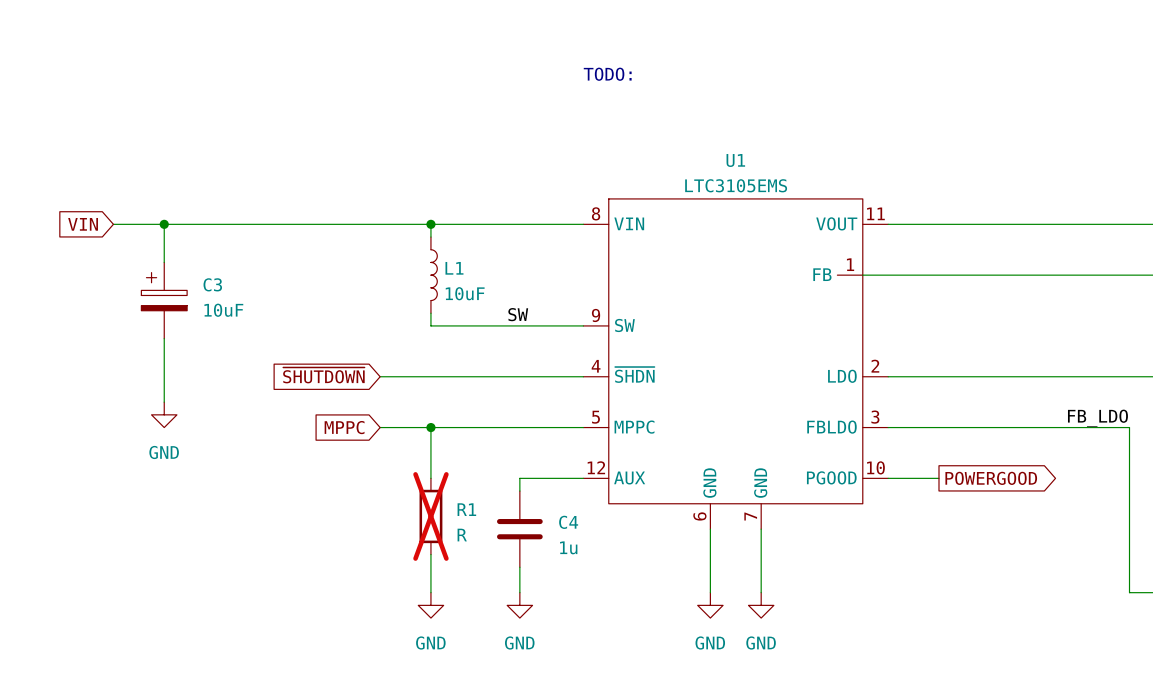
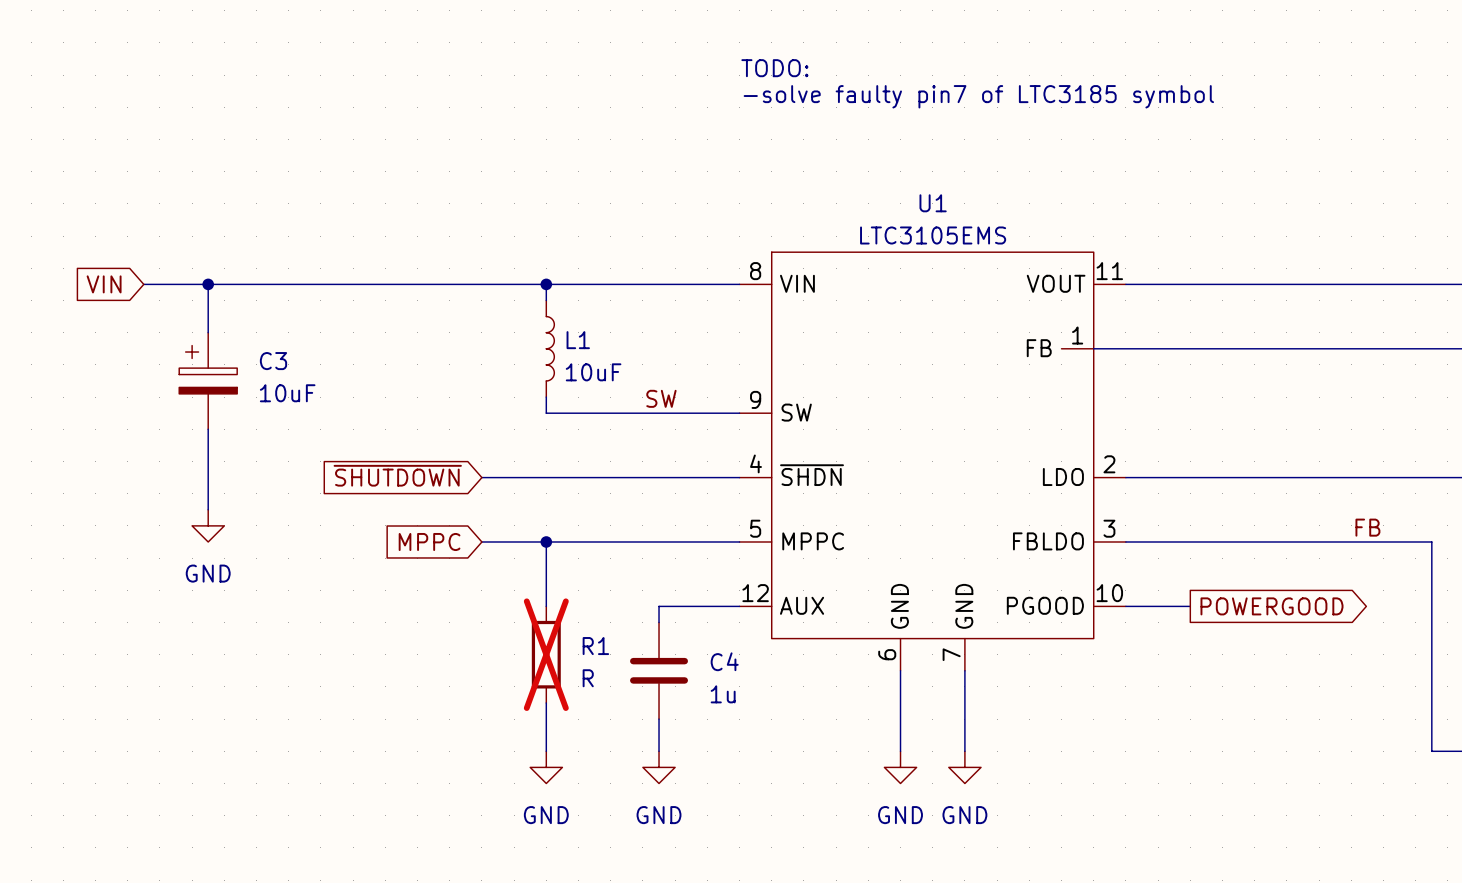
text: none -> TODO: (774, 68)
text: TODO: (607, 74) -> -solve faulty pin7 of LTC3185 symbol (978, 96)
label: FB_LDO (1097, 418) -> FB (1367, 527)

